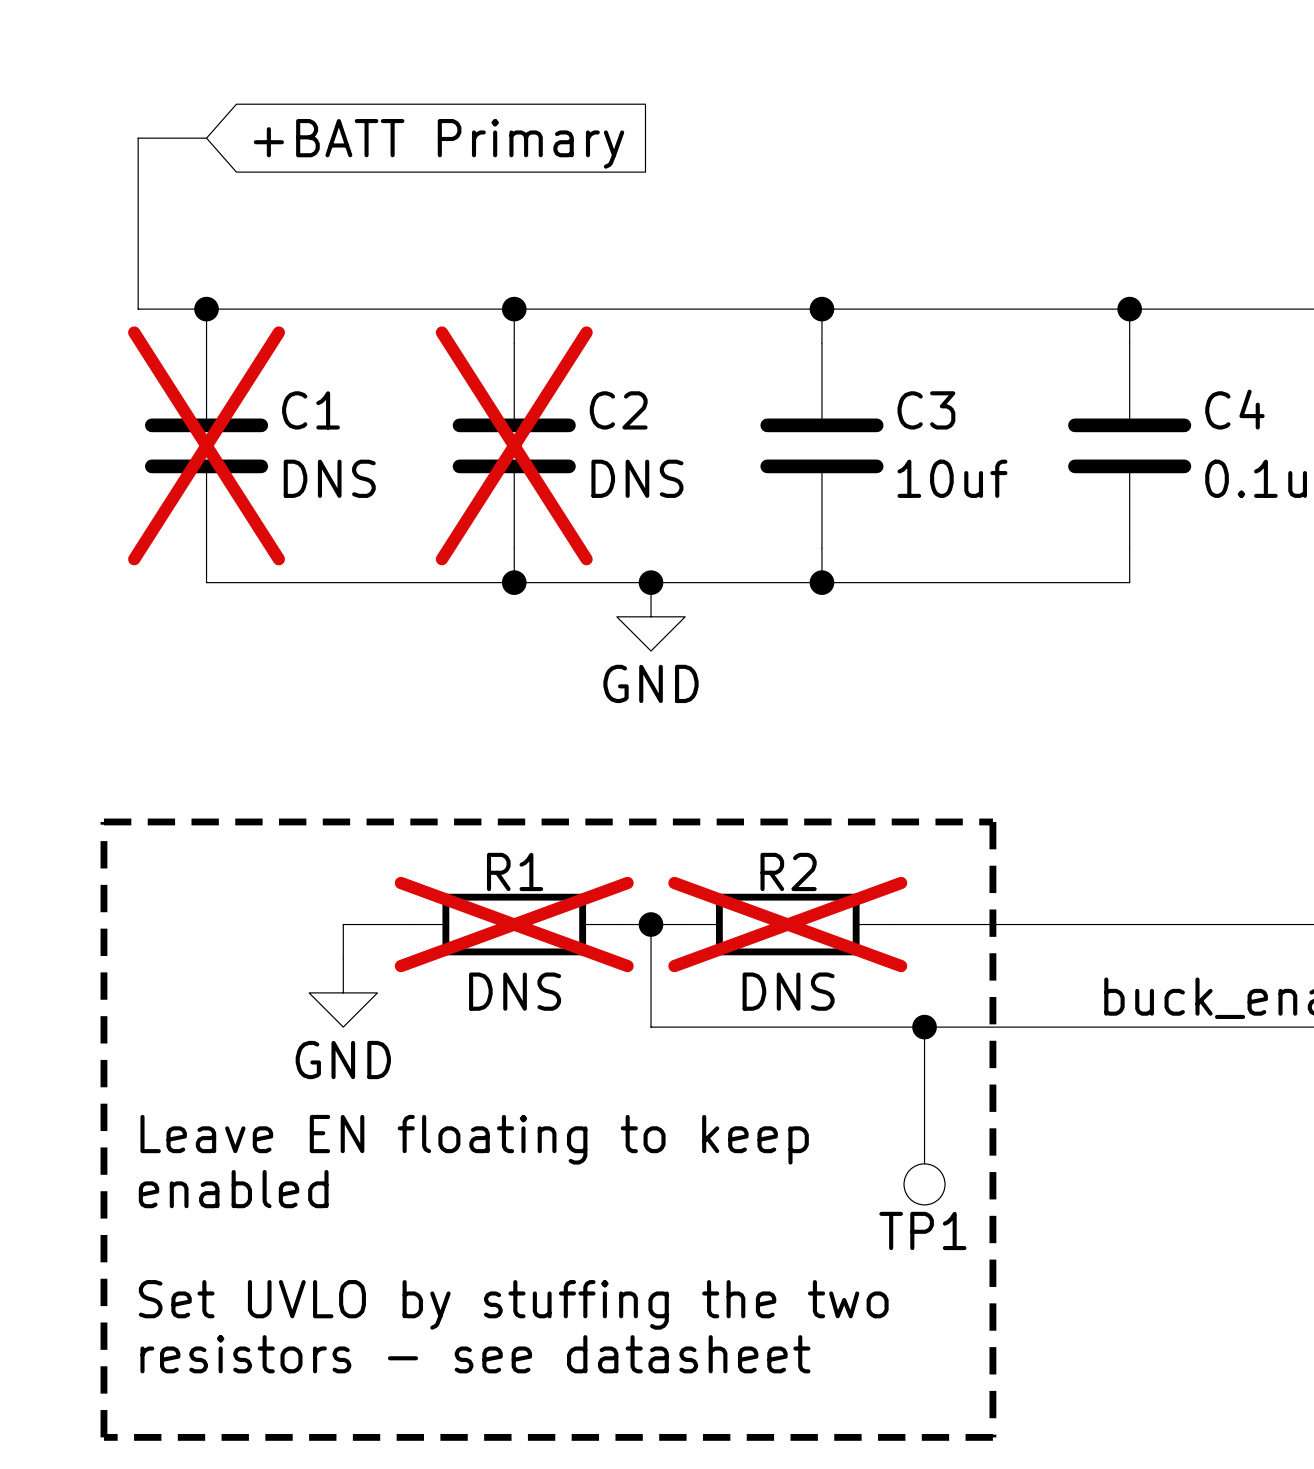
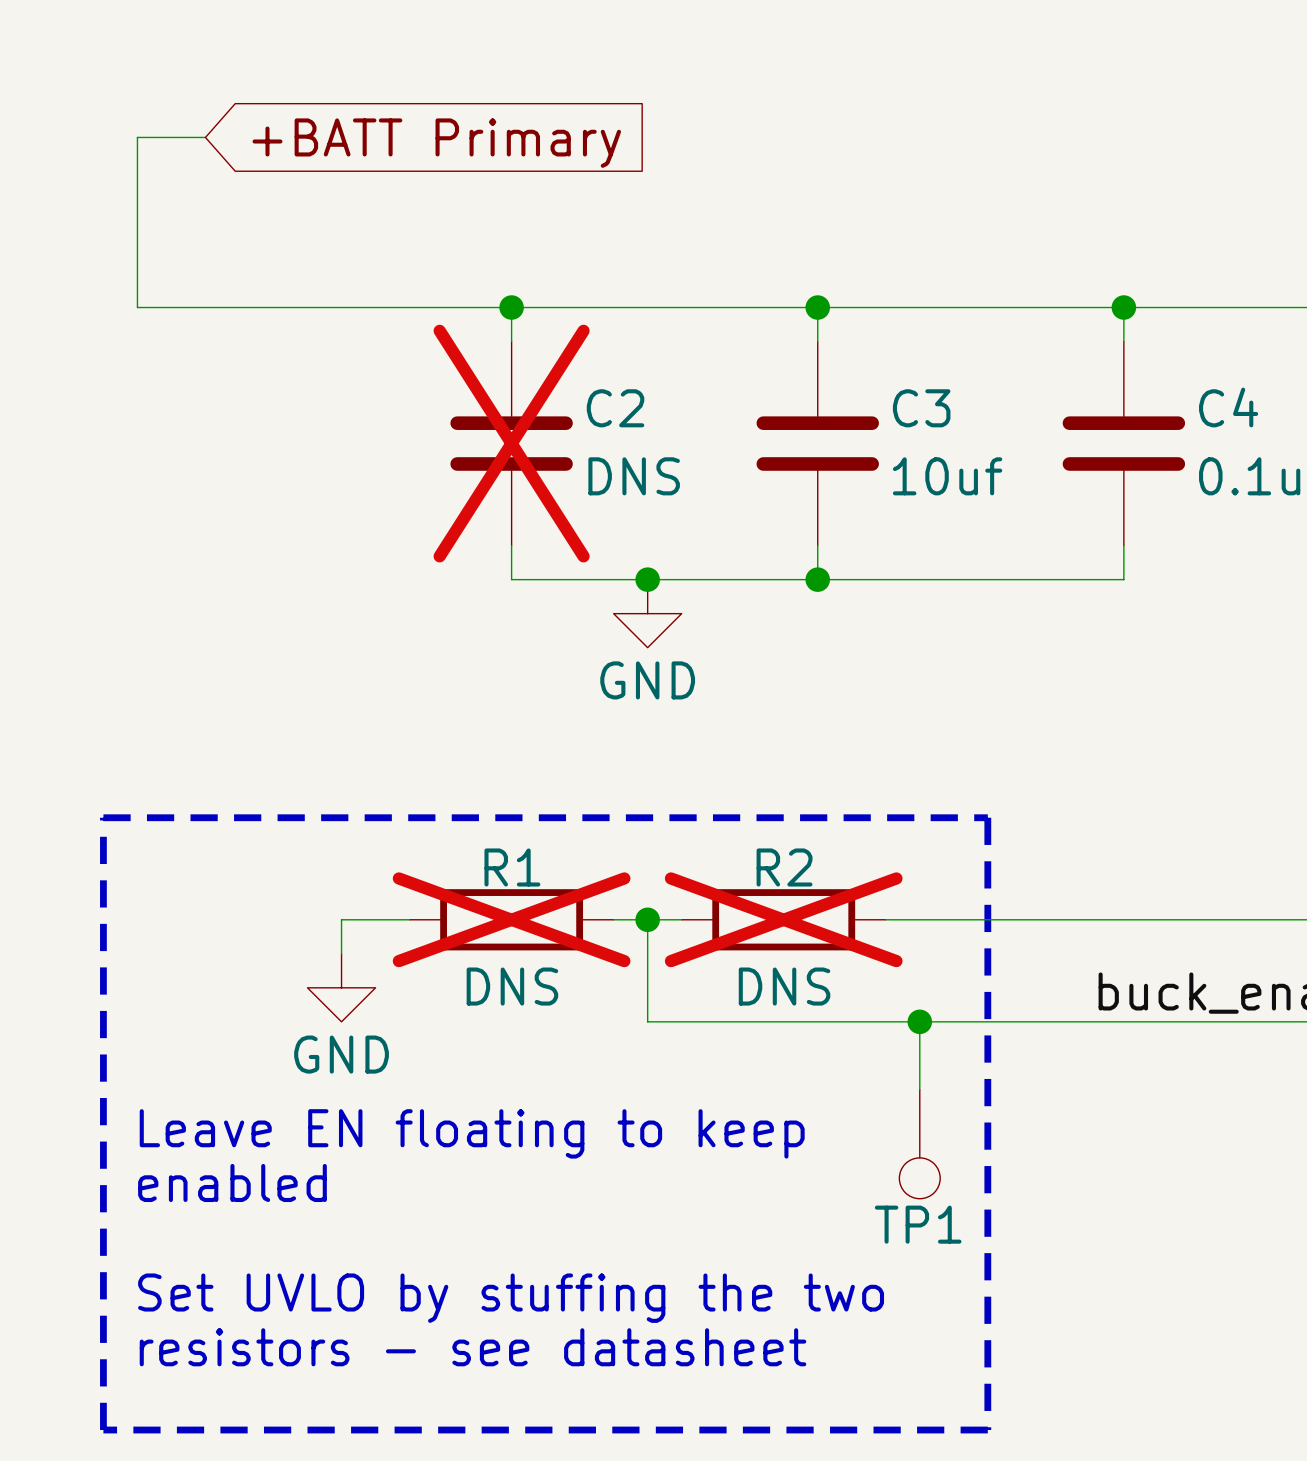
wire: (206, 309) (206, 343) -> none
junction: (206, 309) -> none
C1: DNS (206, 445) -> none
wire: (206, 548) (206, 582) (514, 582) -> none
junction: (514, 582) -> none

